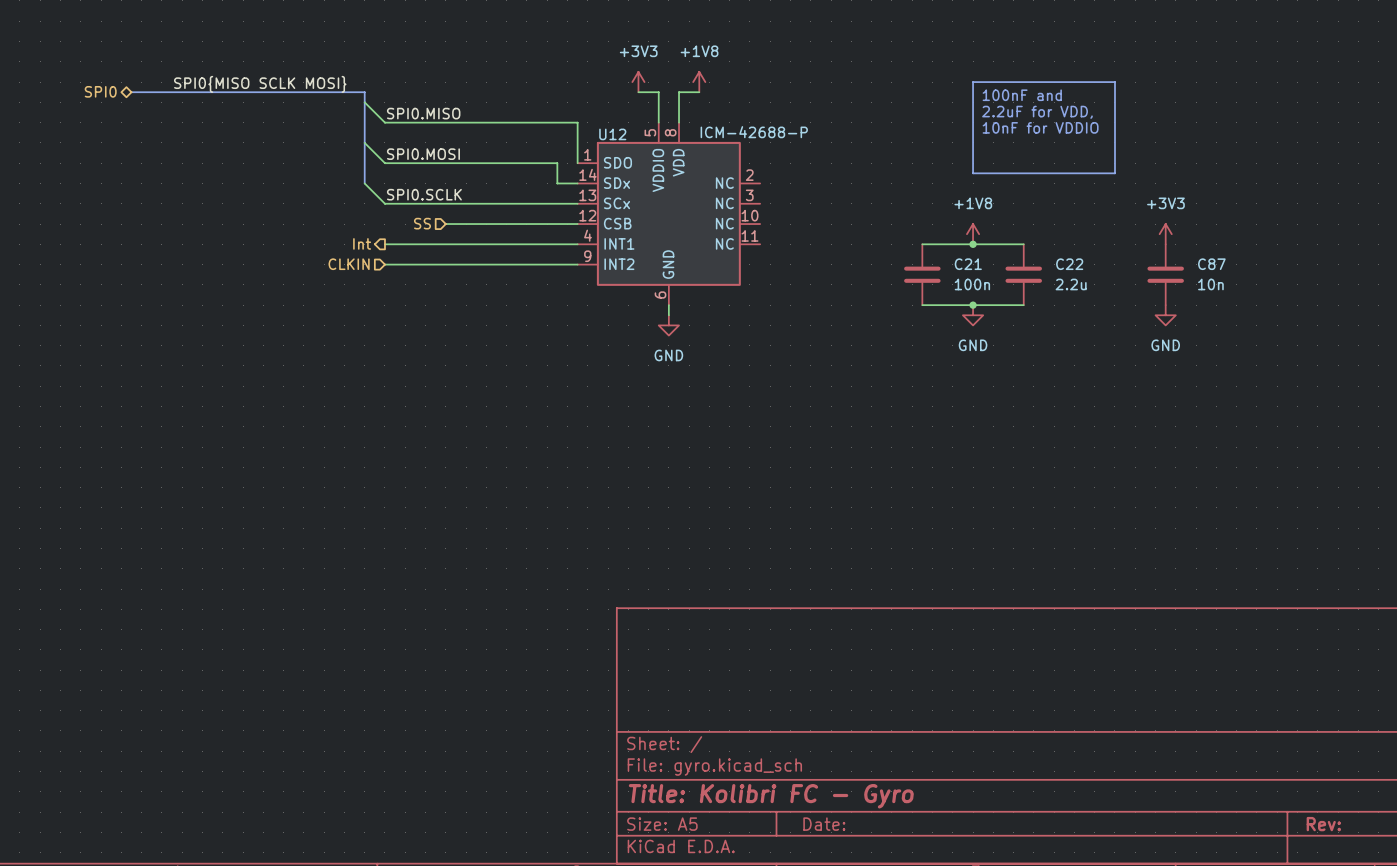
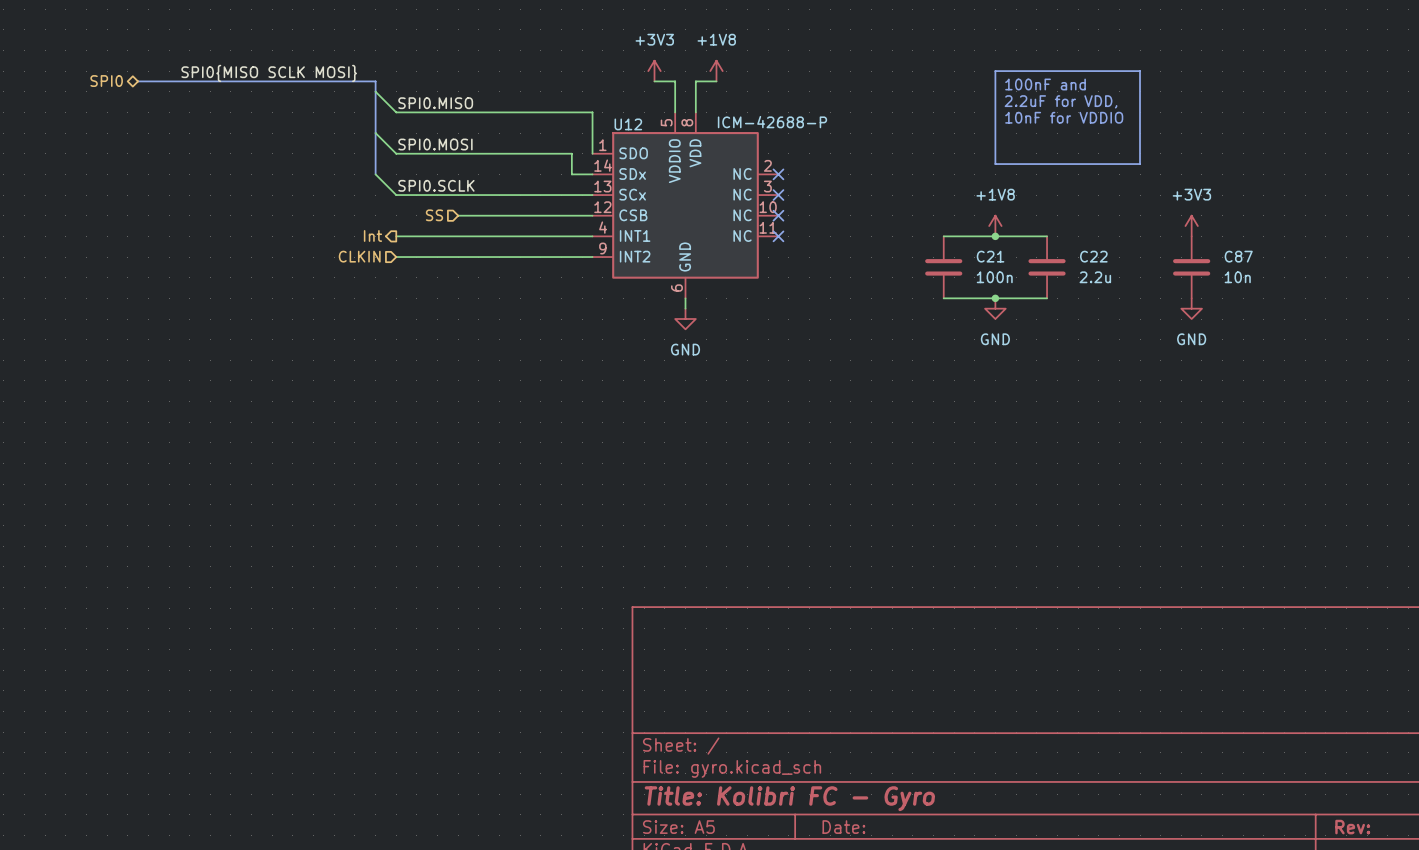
no-connect mark: none -> (778, 174)
no-connect mark: none -> (778, 195)
no-connect mark: none -> (778, 215)
no-connect mark: none -> (778, 236)

